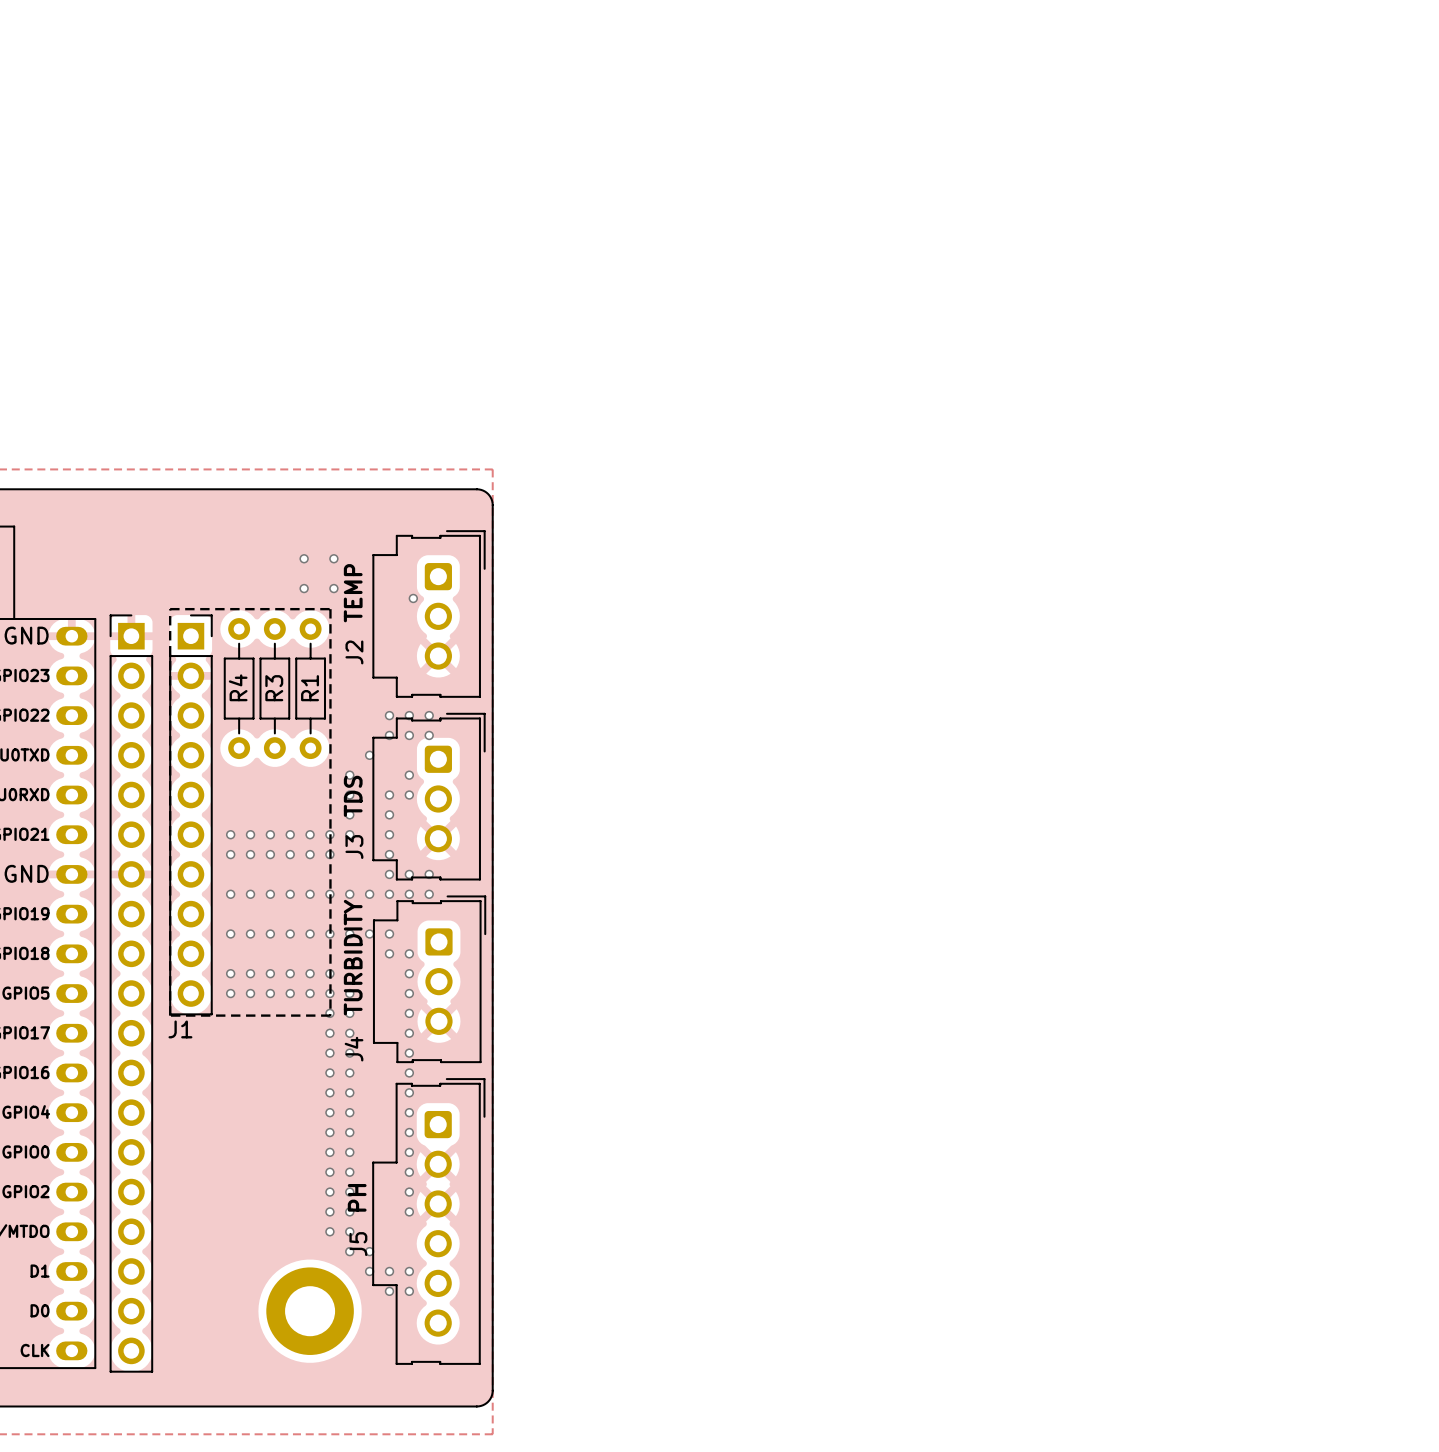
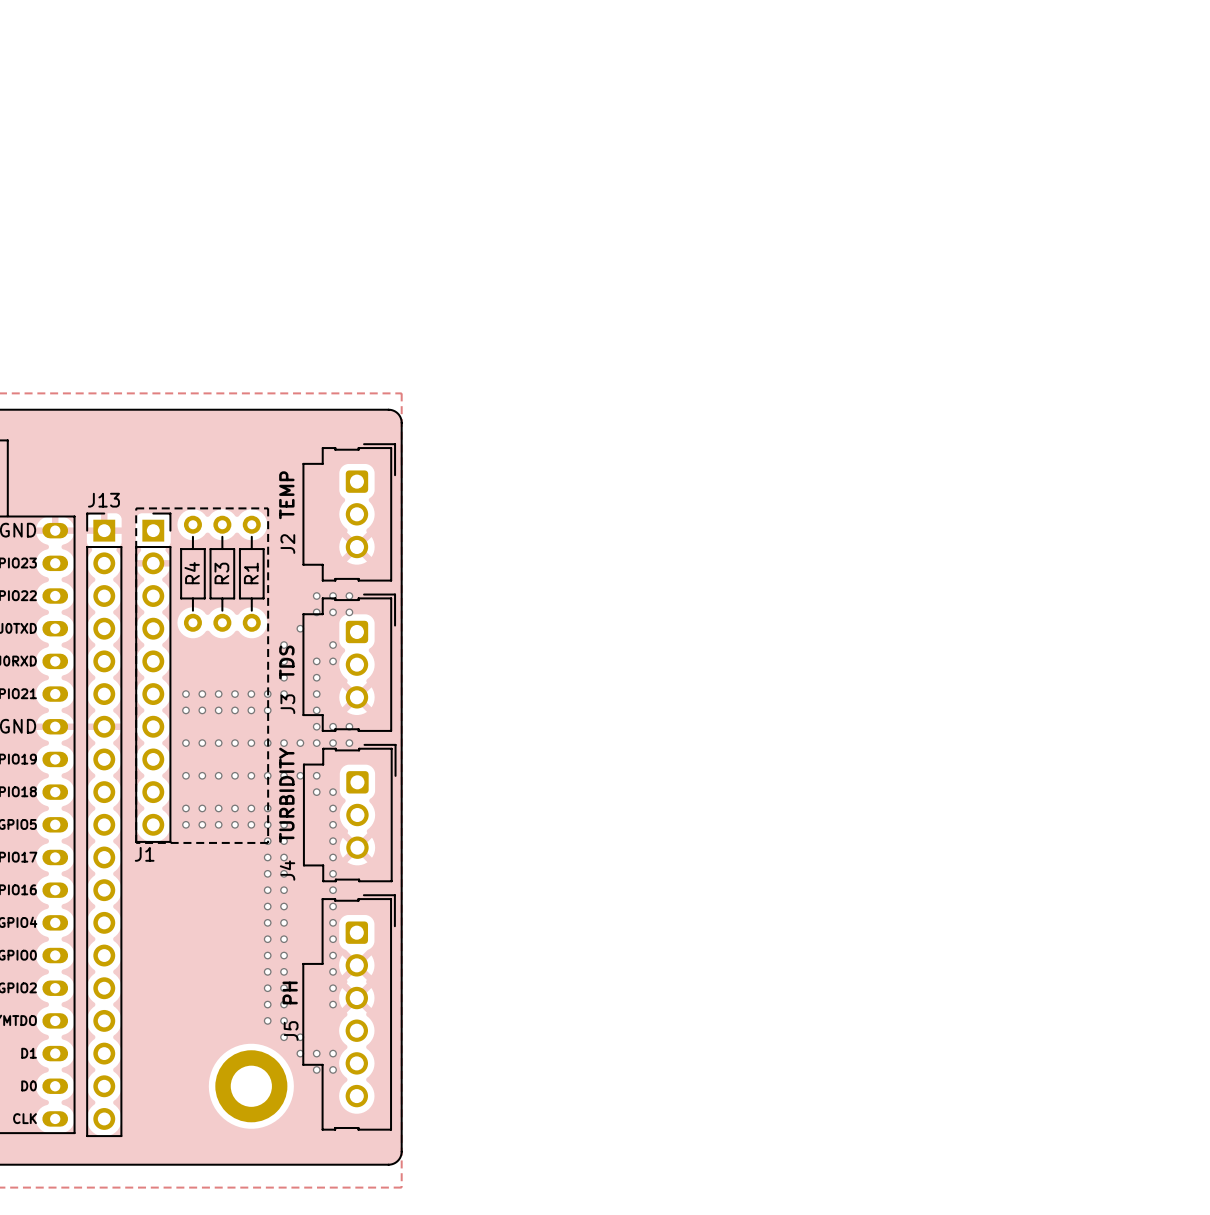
via: (304, 558) -> none
via: (333, 558) -> none
via: (304, 588) -> none
via: (333, 588) -> none
via: (413, 598) -> none
J13 name: none -> J13 (103, 500)

